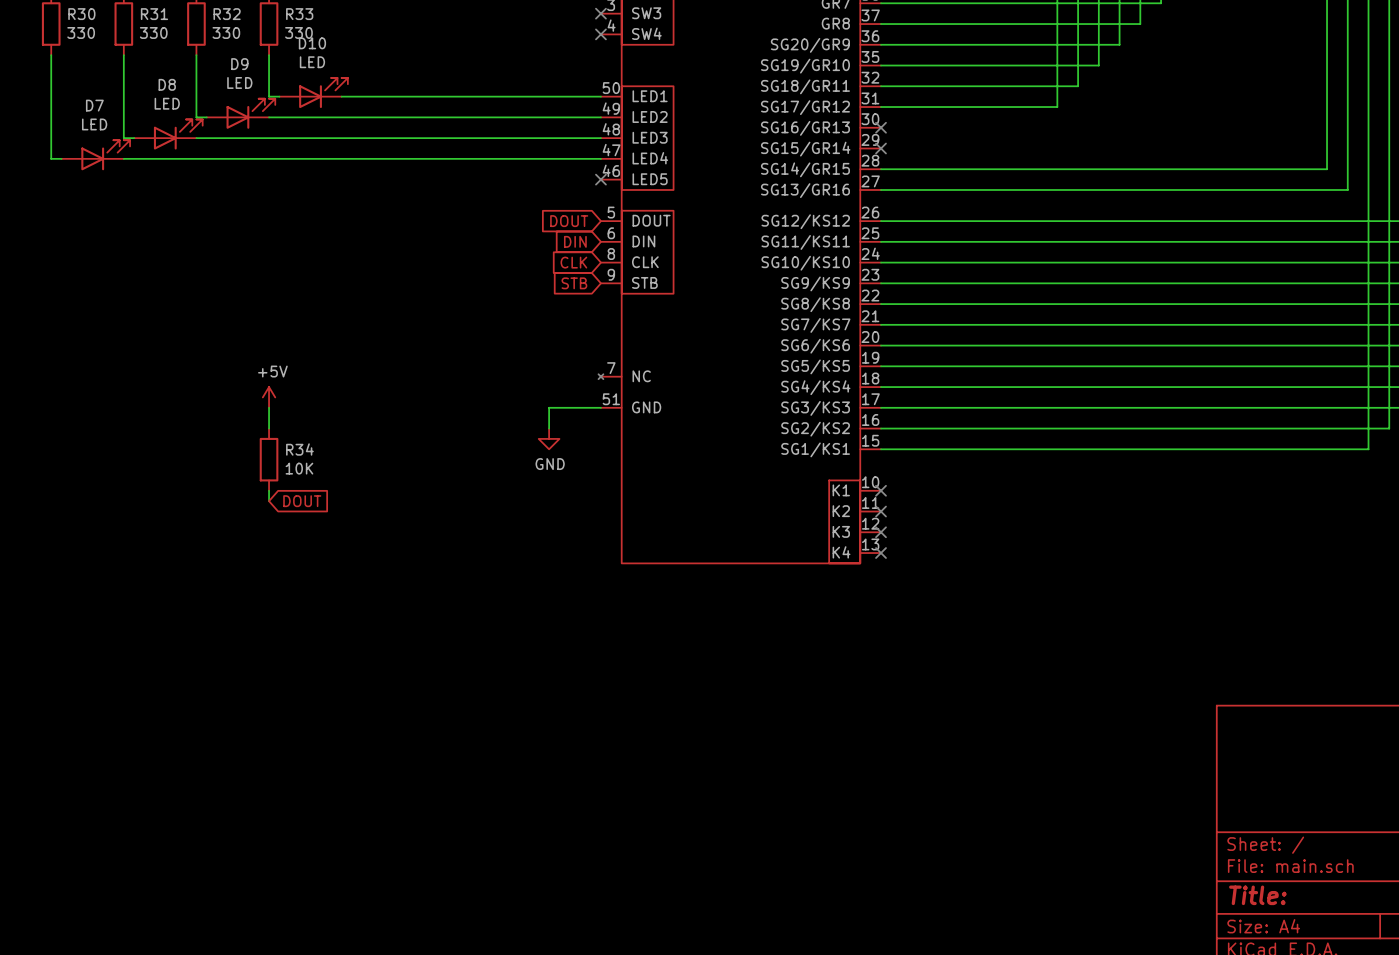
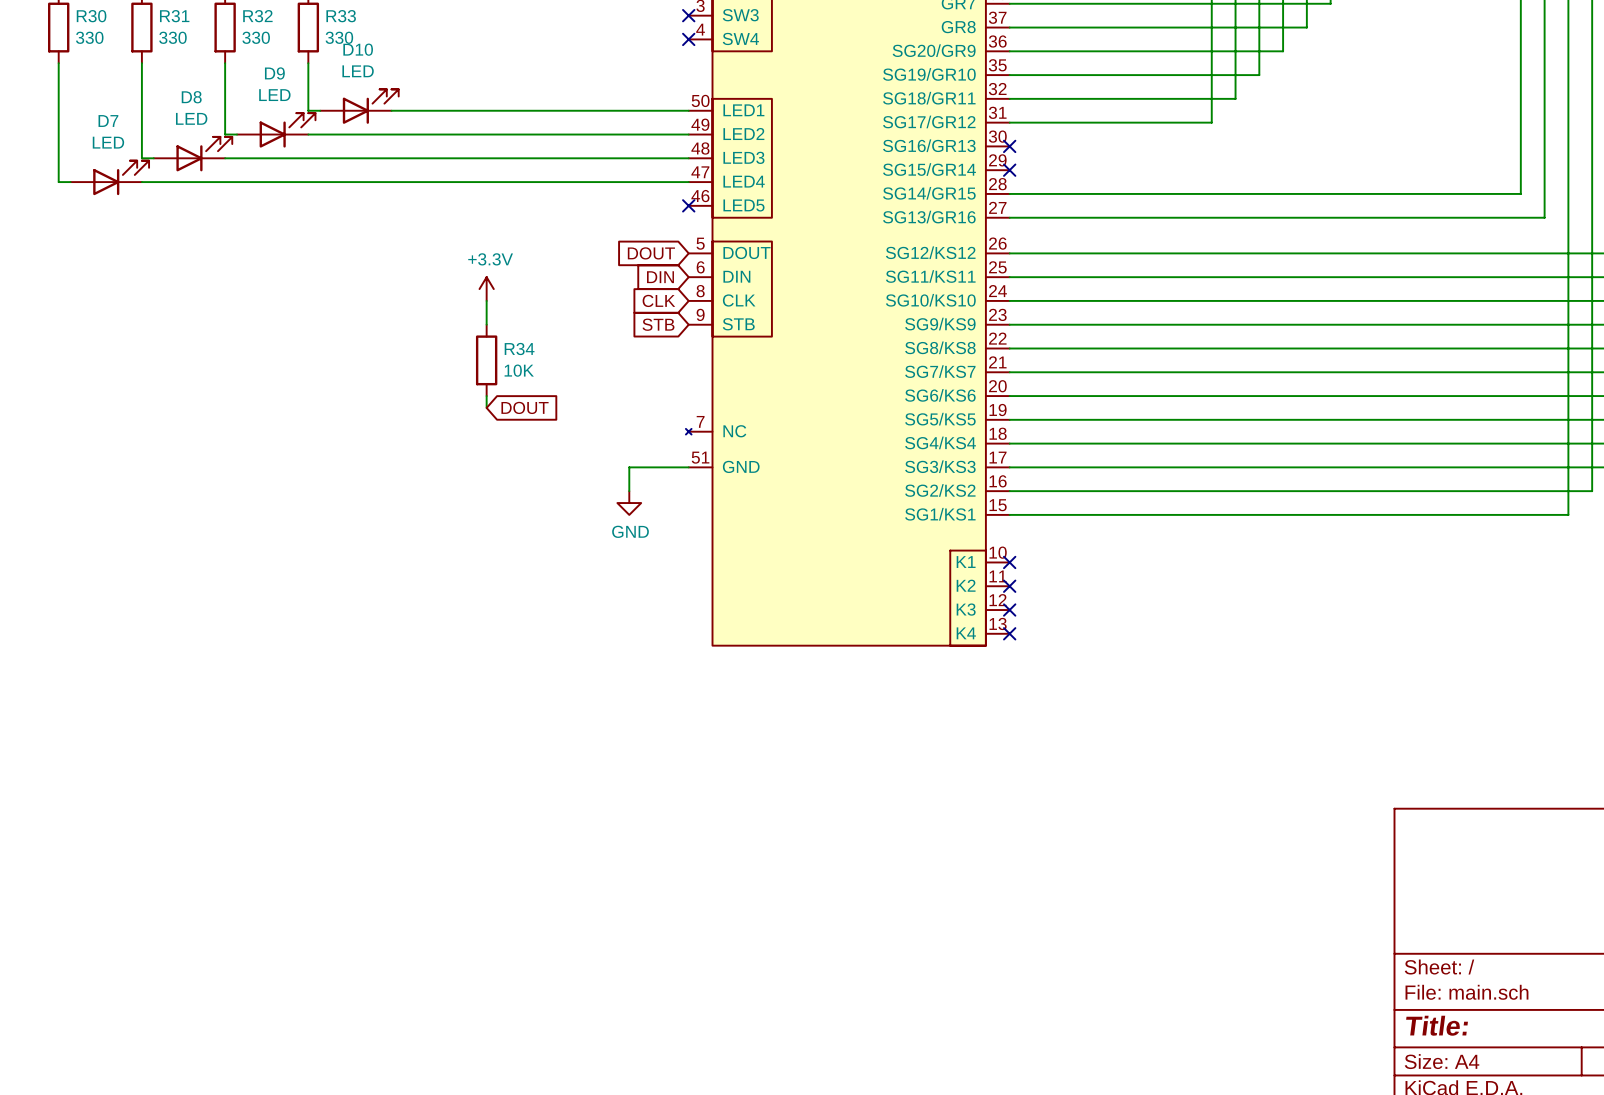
power symbol: none -> +3.3V (486, 289)
wire: none -> (486, 300) (486, 324)
wire: none -> (486, 396) (486, 407)
global label: none -> DOUT (525, 407)
power symbol: +5V (269, 397) -> none
wire: (269, 407) (269, 428) -> none
R34 position: (269, 459) -> (486, 360)
wire: (269, 490) (269, 501) -> none
global label: DOUT (302, 501) -> none

